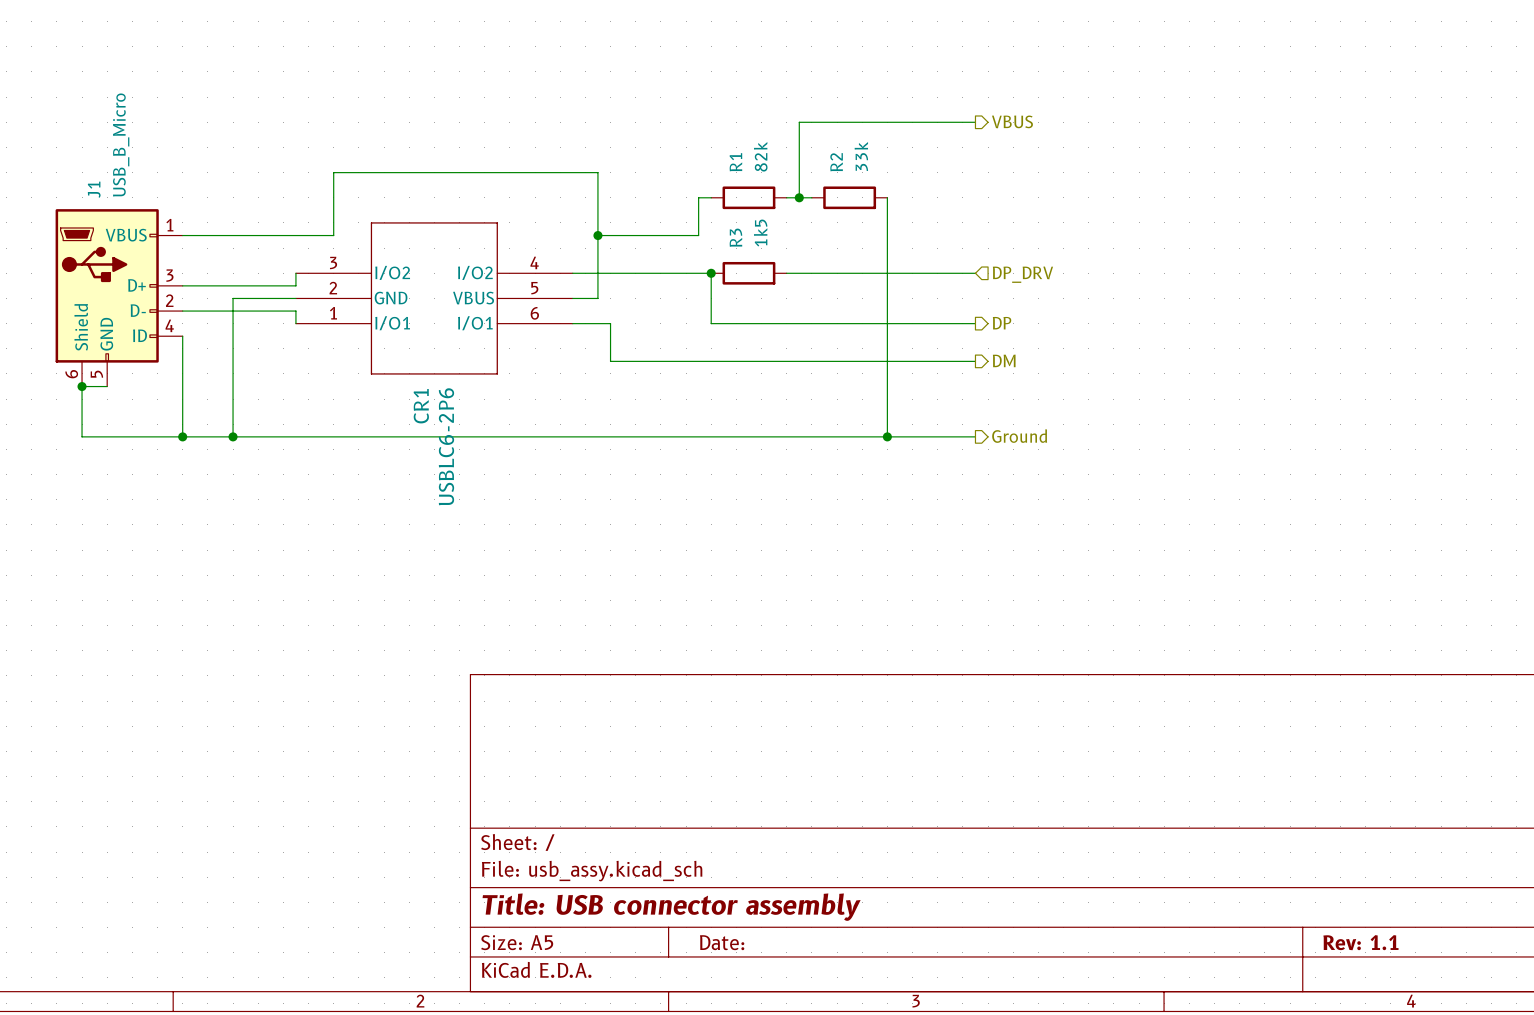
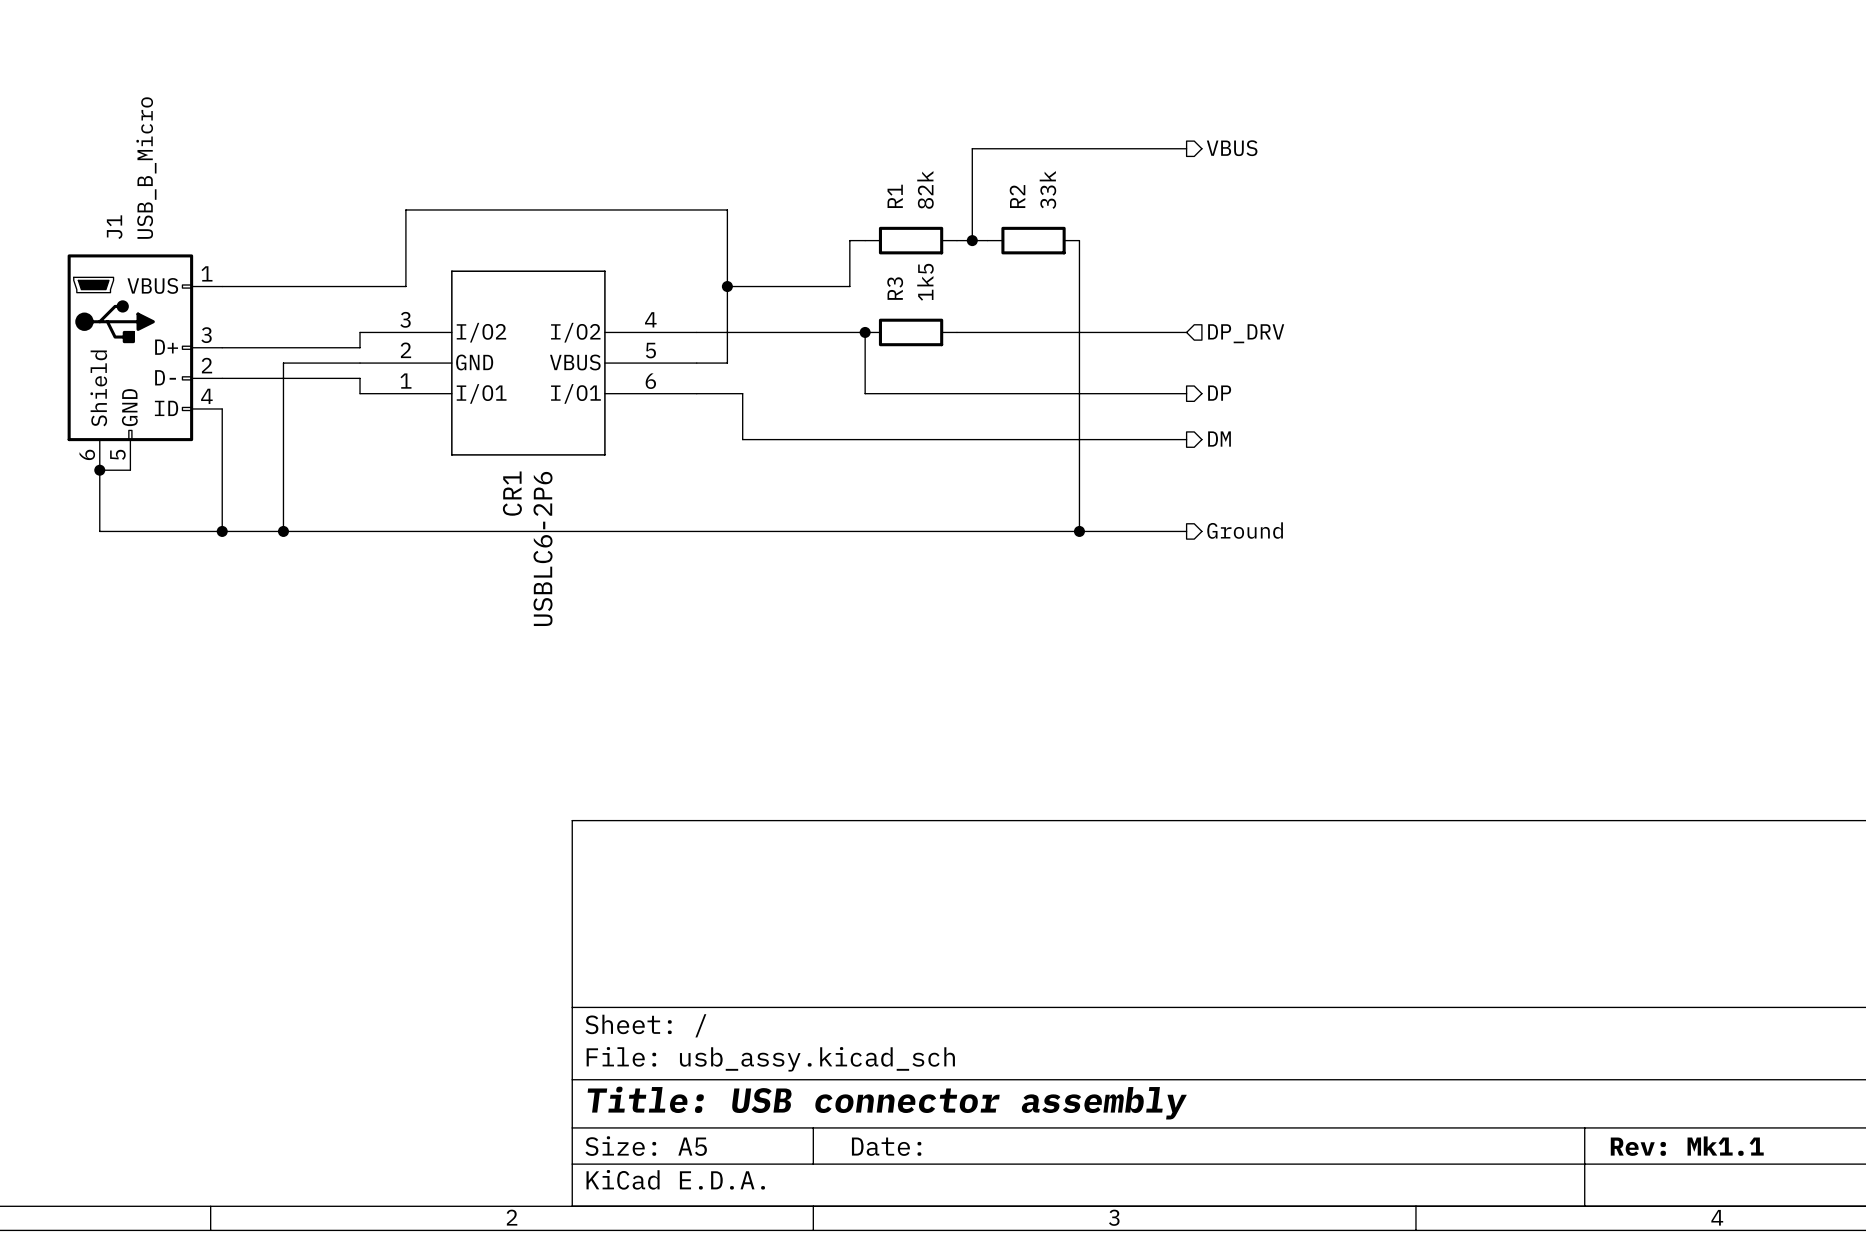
title block: Rev: 1.1 (1360, 942) -> Rev: Mk1.1 (1687, 1146)

